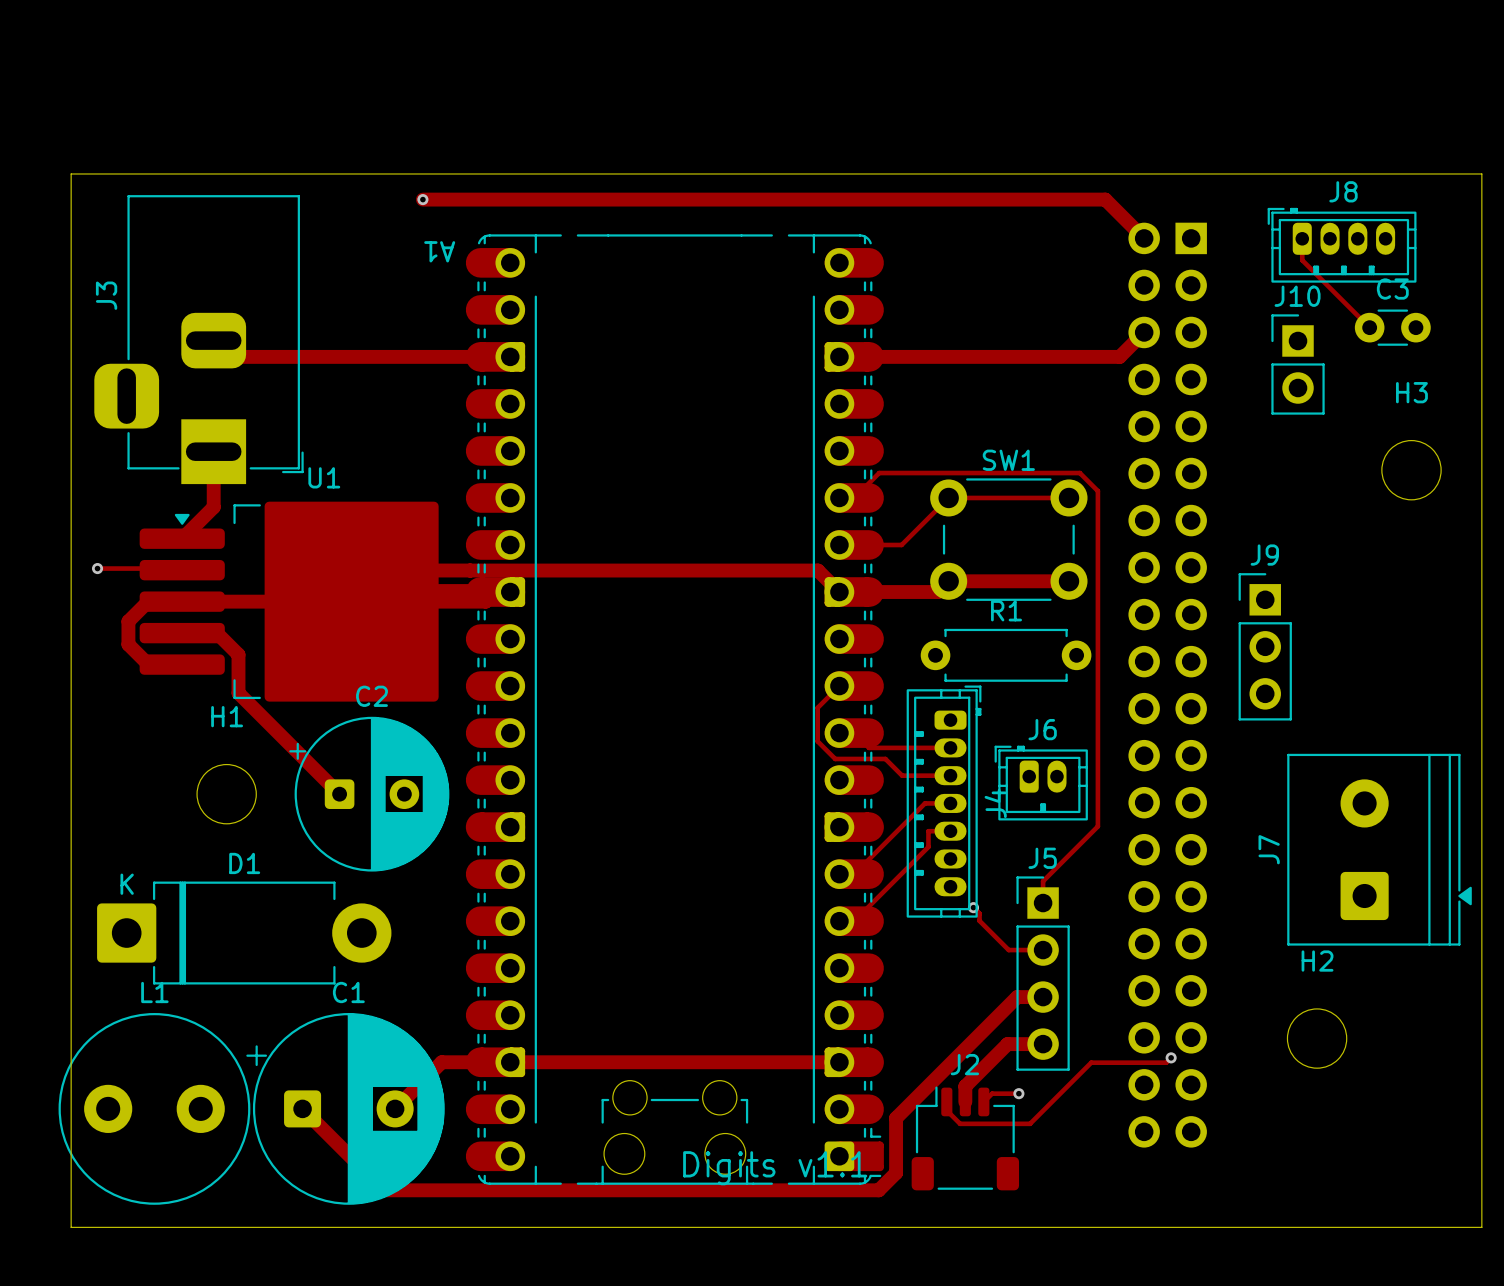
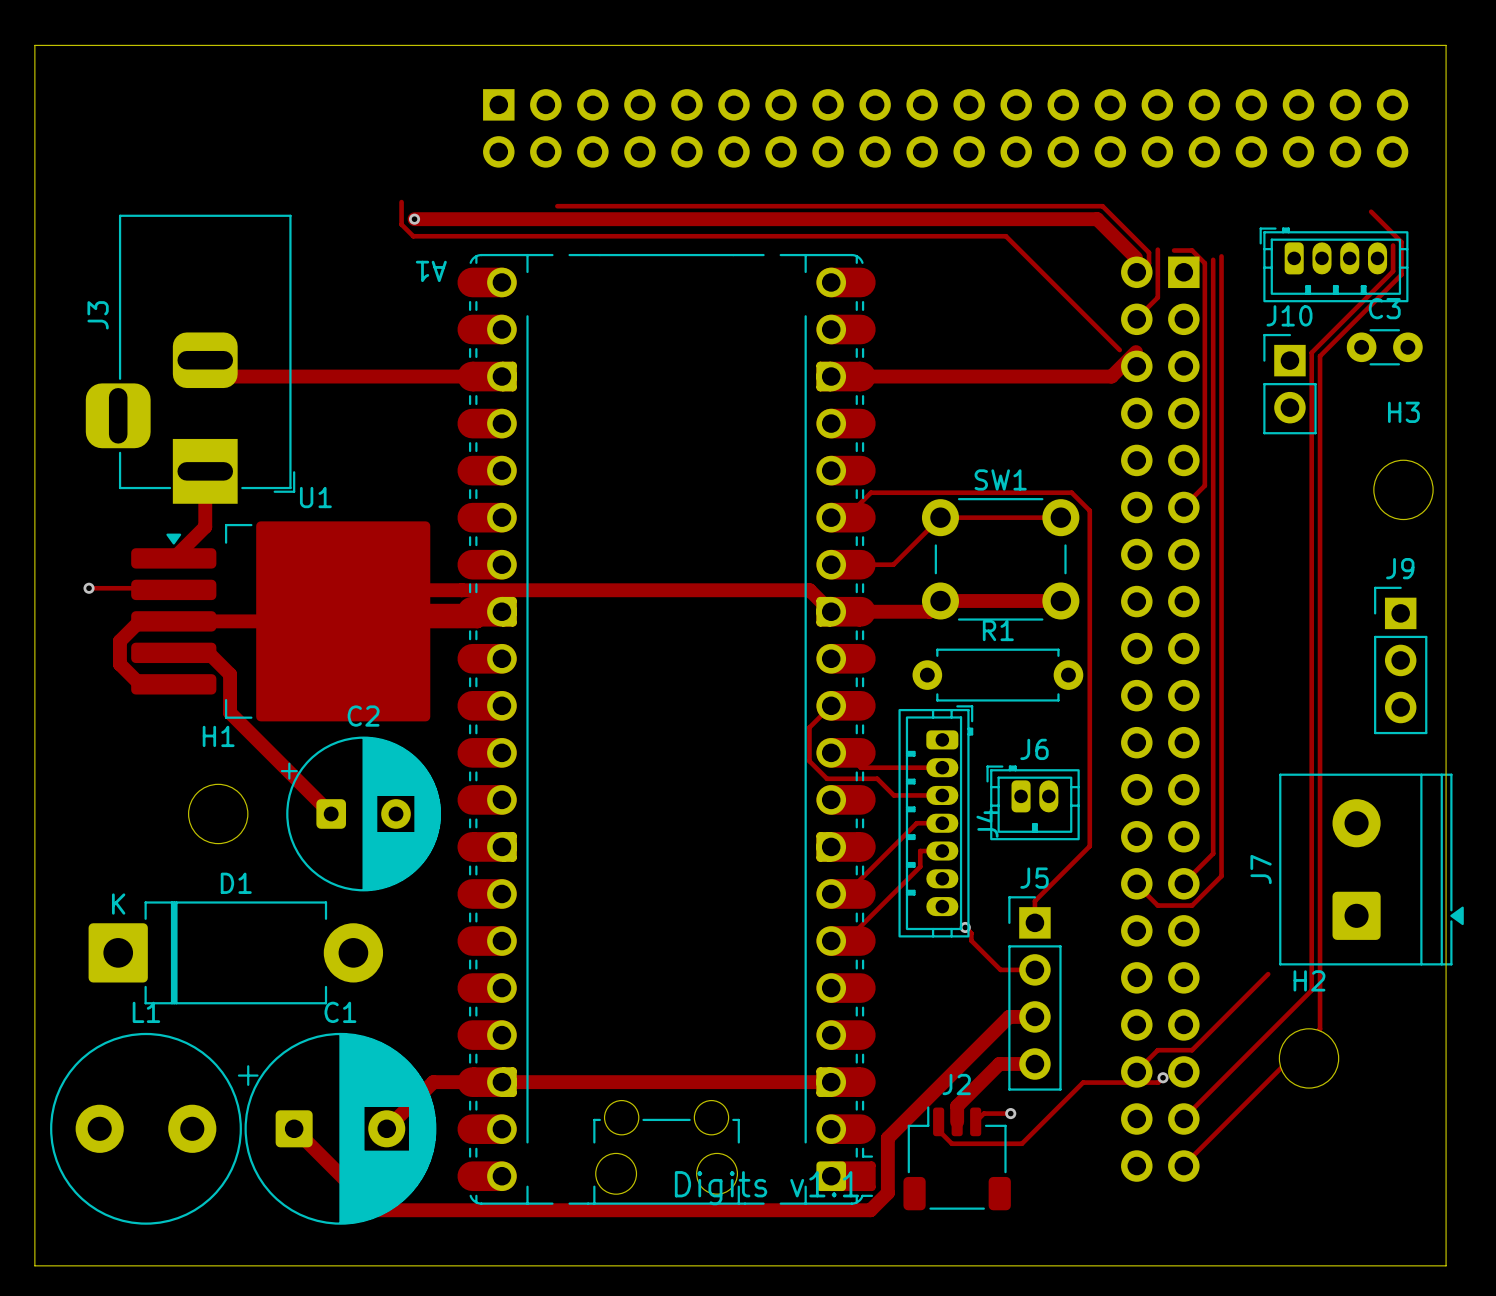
part: none -> (945, 128)
board edge: (71, 173) (1481, 173) (1481, 1227) (71, 1227) (71, 173) -> (34, 45) (34, 1265) (1446, 1265) (1446, 45) (34, 45)
track: none -> (401, 202) (401, 224) (413, 236) (1005, 236) (1119, 350)
track: none -> (557, 206) (1102, 206) (1149, 252) (1149, 263) (1140, 272) (1136, 272)
J8 name: J8 (1343, 191) -> none
track: none -> (1371, 211) (1401, 242) (1401, 274) (1320, 356) (1320, 1029) (1183, 1166)
track: none -> (1393, 245) (1393, 271) (1311, 352) (1311, 990) (1183, 1118)
track: none -> (1157, 249) (1157, 297) (1136, 319)
track: none -> (1174, 250) (1192, 250) (1204, 263) (1204, 485) (1183, 507)
track: none -> (1221, 256) (1221, 876) (1192, 905) (1157, 905) (1136, 883)
track: (1302, 238) (1302, 260) (1369, 327) -> none
track: none -> (1213, 259) (1213, 853) (1183, 883)
J9 position: (1265, 646) -> (1400, 660)
part position: (1167, 685) -> (1160, 719)
track: none -> (1268, 974) (1192, 1050) (1157, 1050) (1136, 1071)

